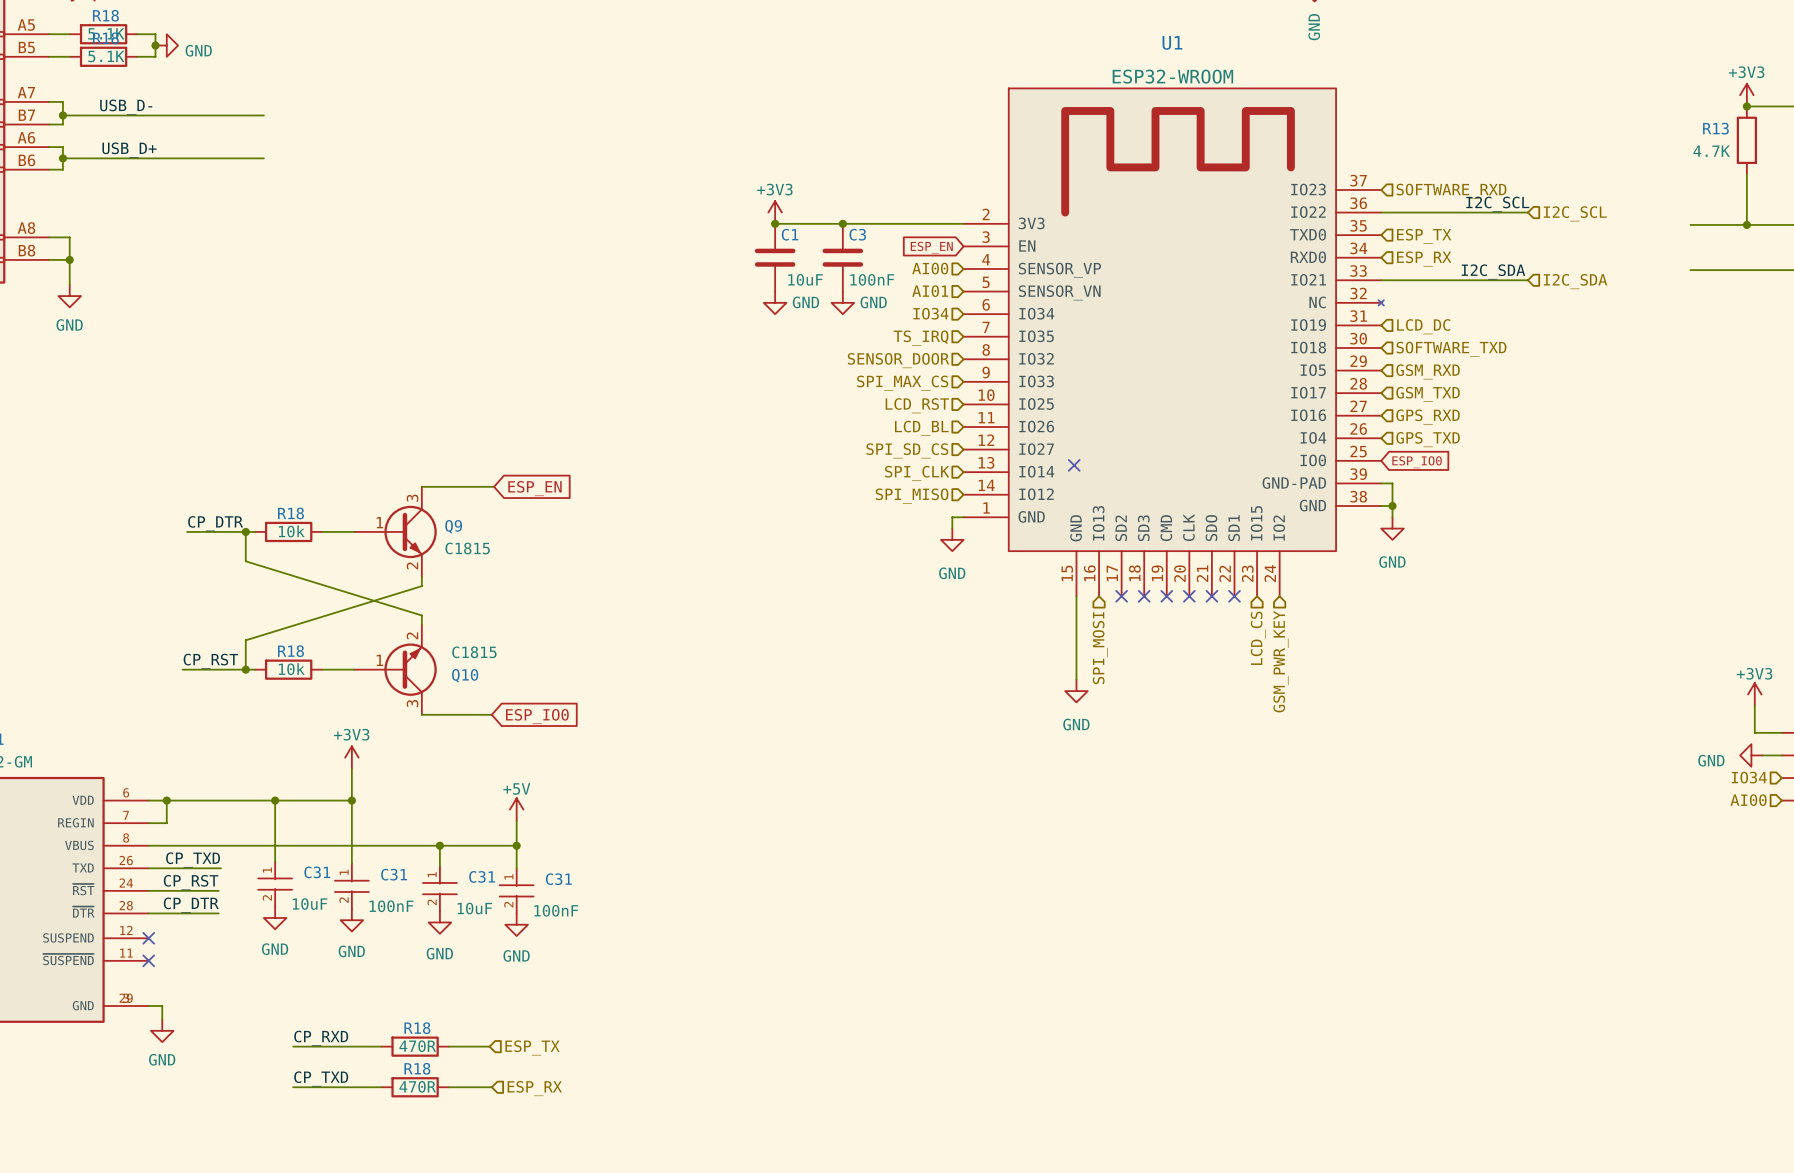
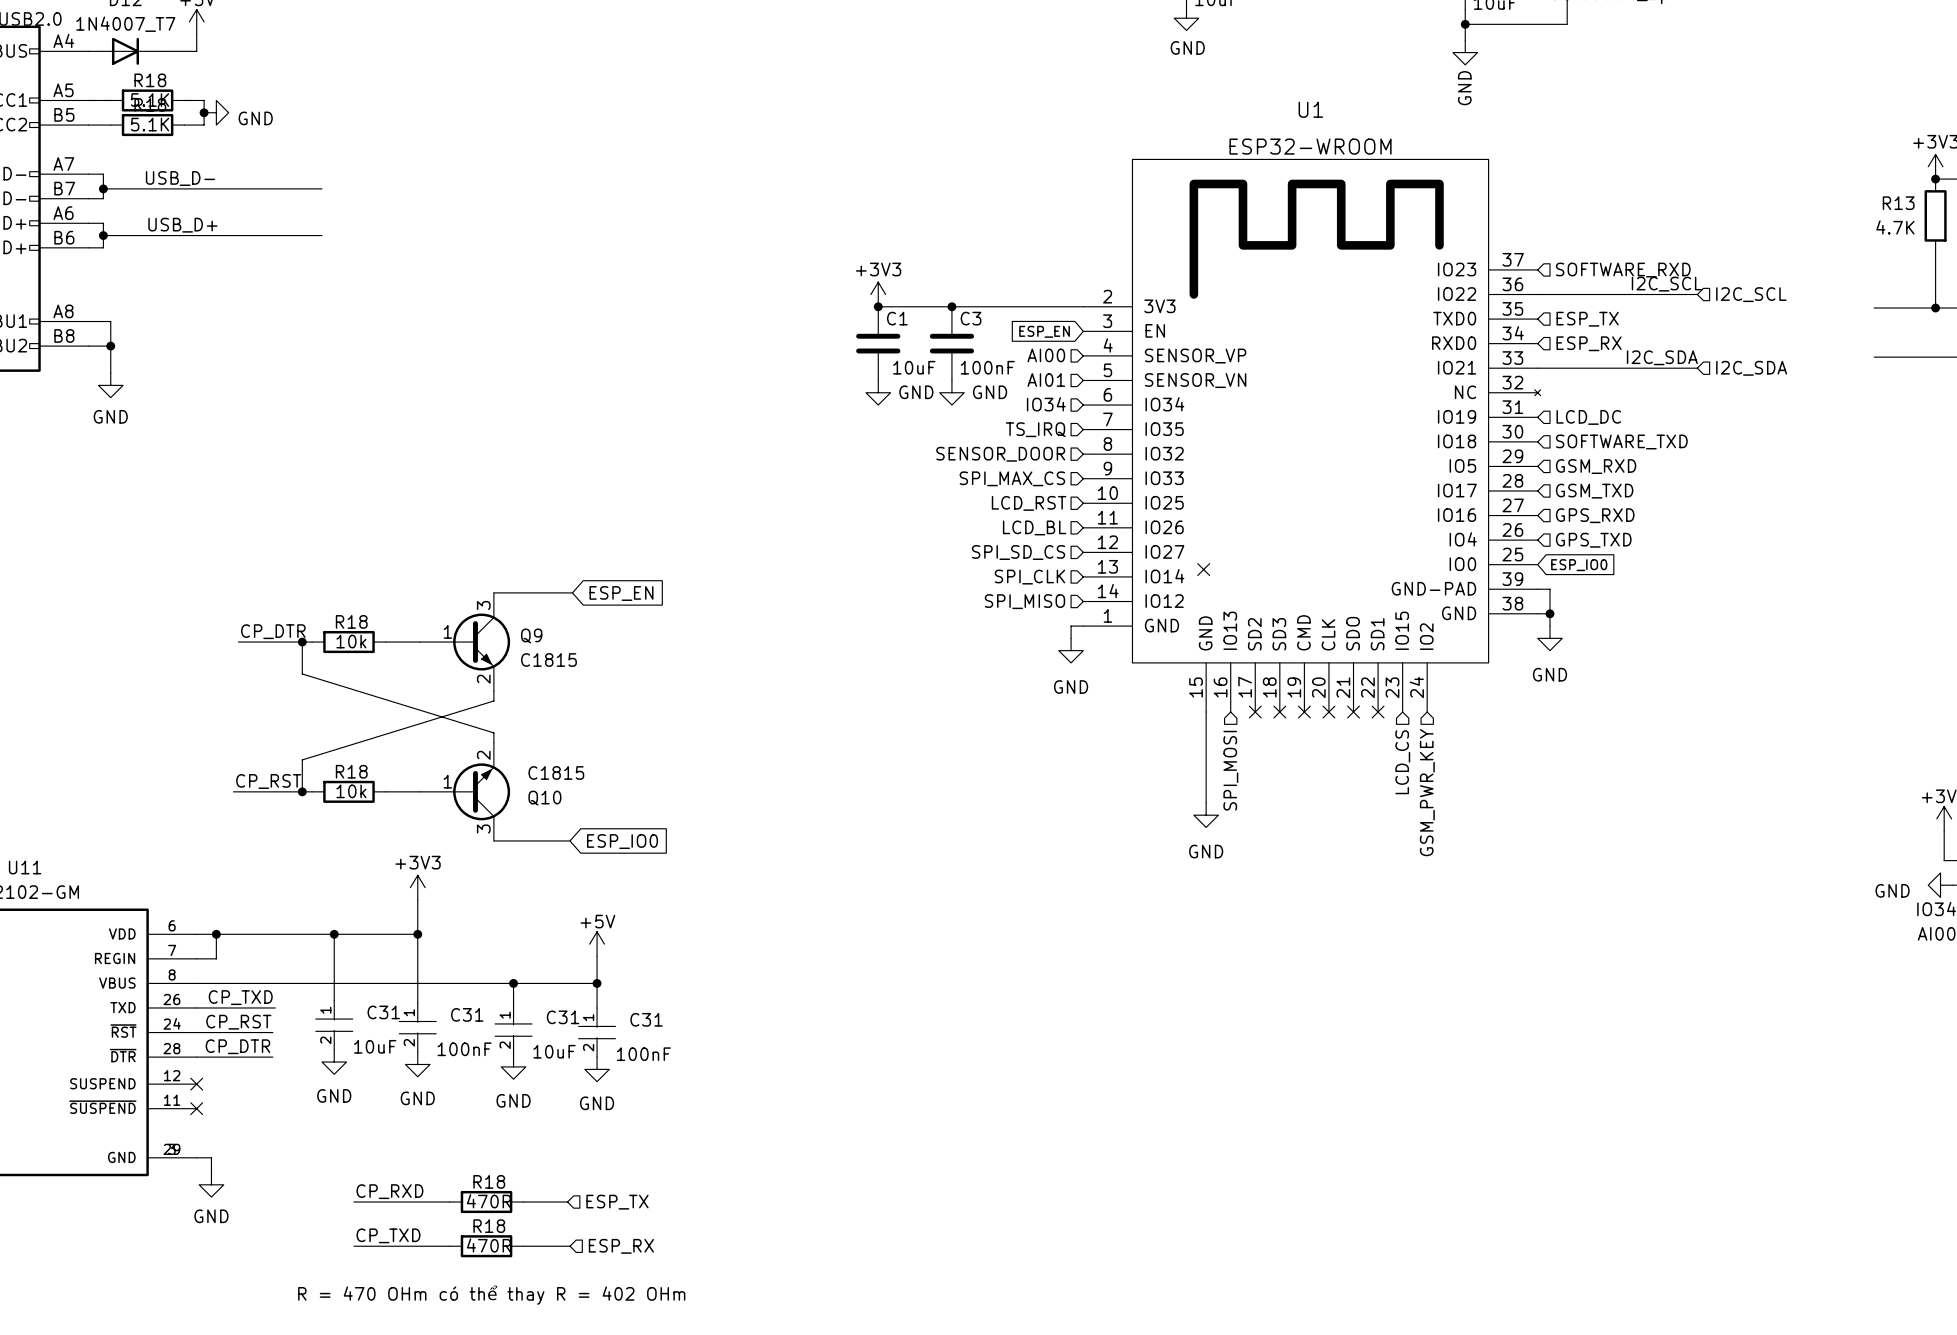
text: none -> R = 470 OHm có thể thay R = 402 OHm (491, 1294)

